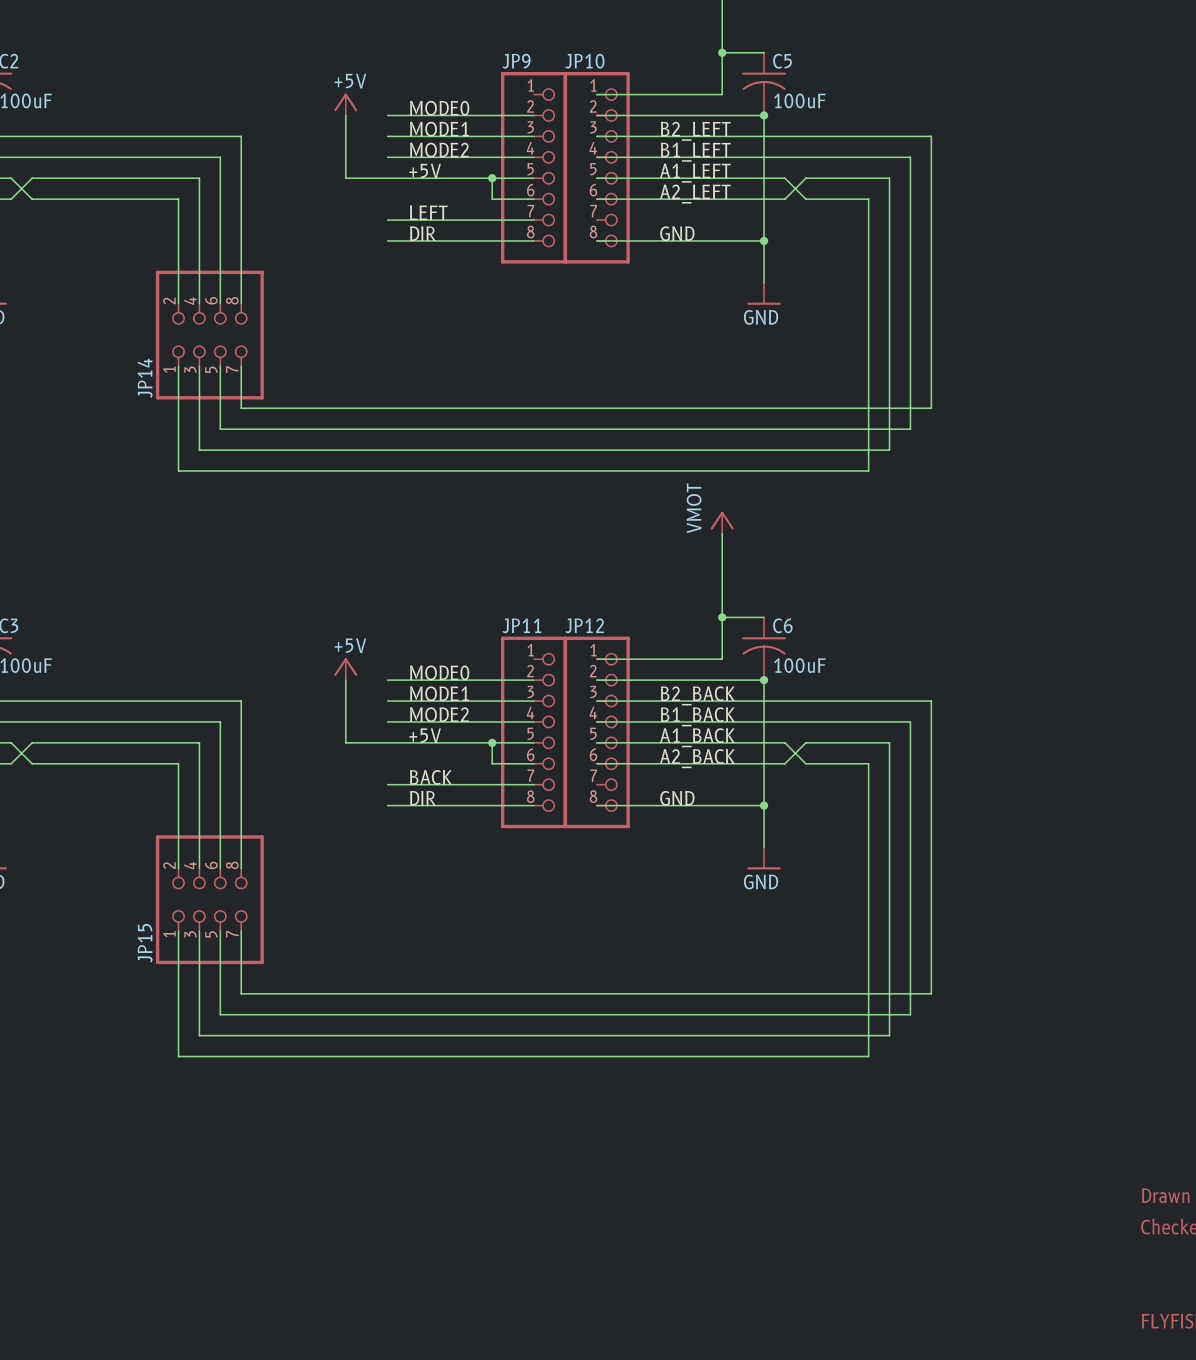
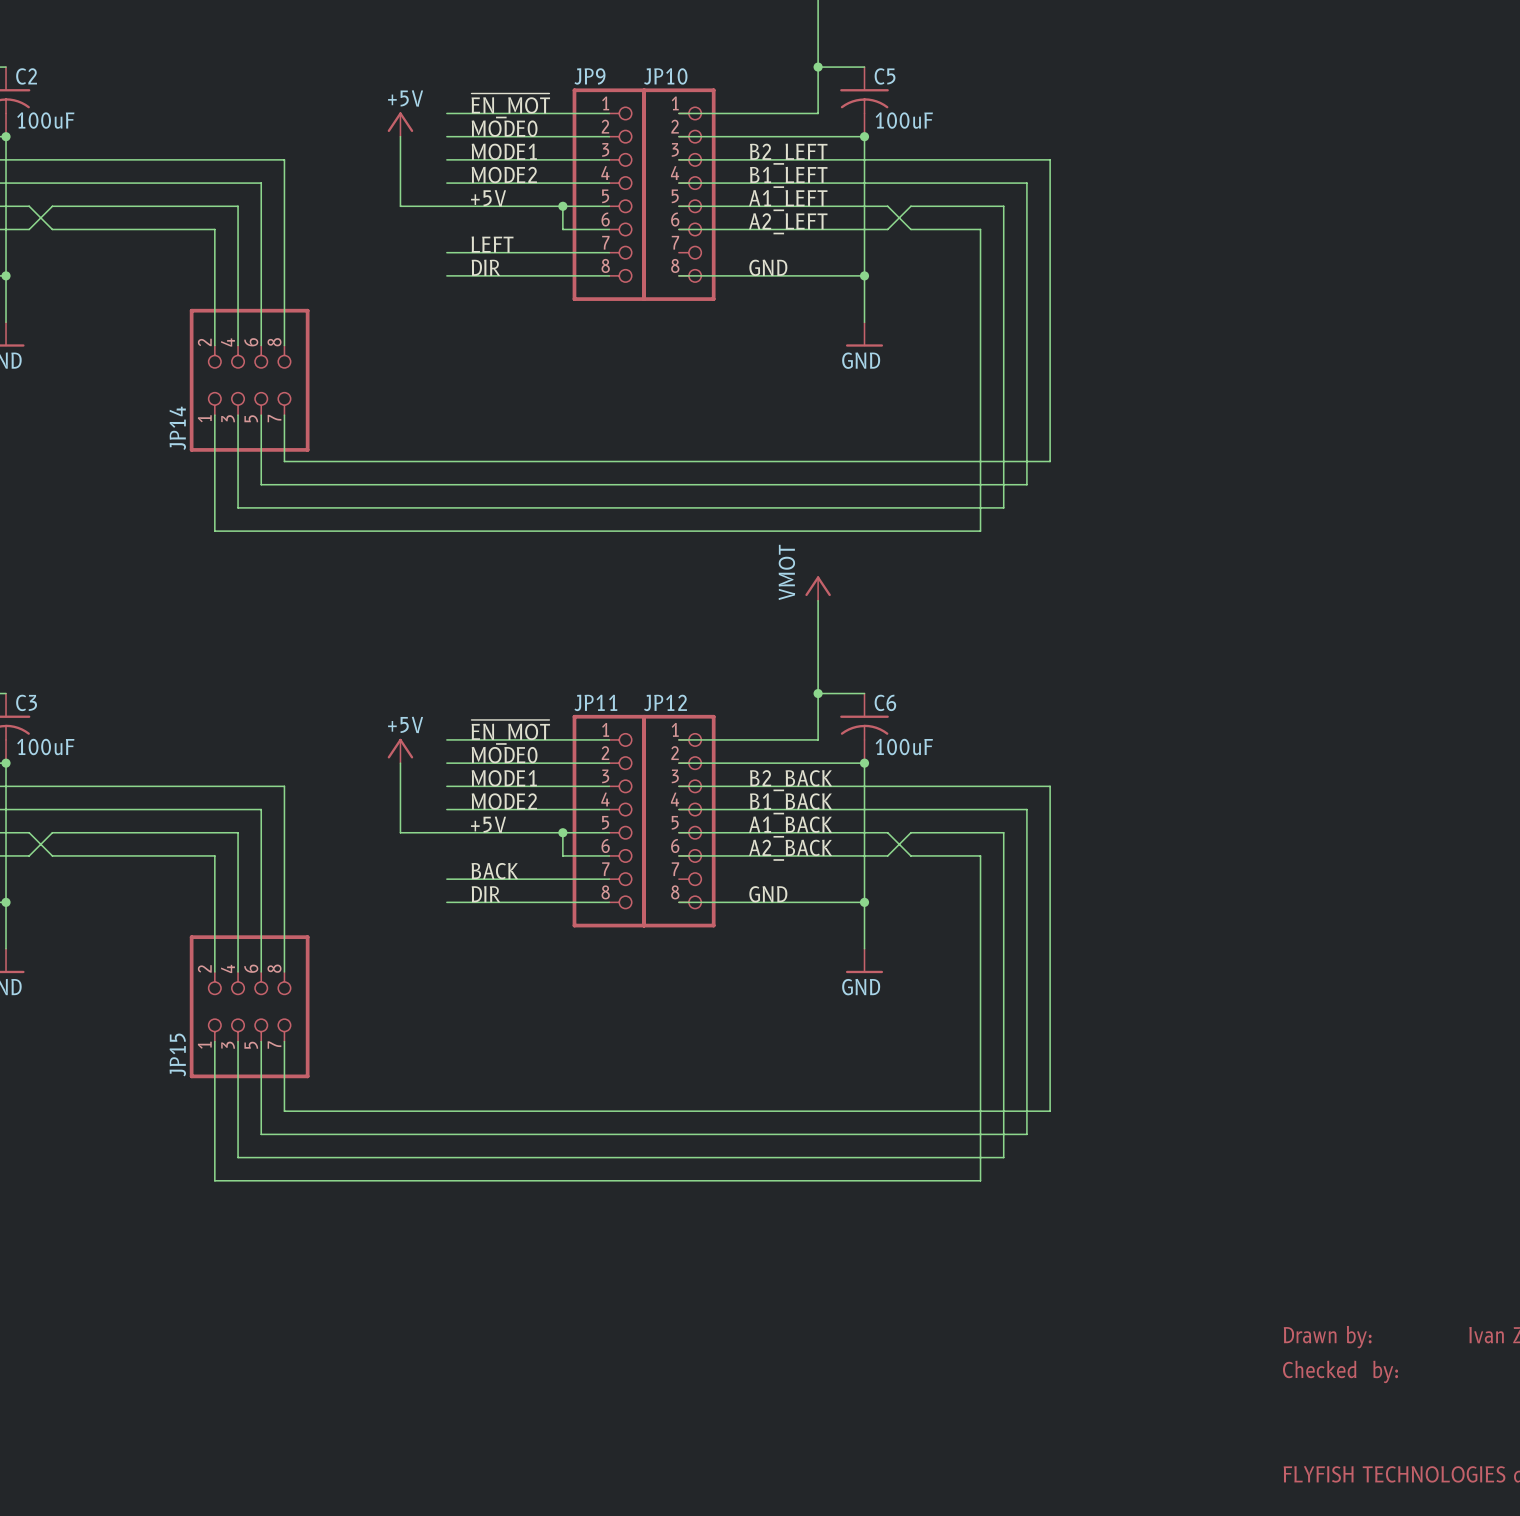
label: none -> ~{EN_MOT} (510, 105)
wire: none -> (446, 113) (609, 113)
label: none -> ~{EN_MOT} (510, 732)
wire: none -> (446, 739) (609, 739)

